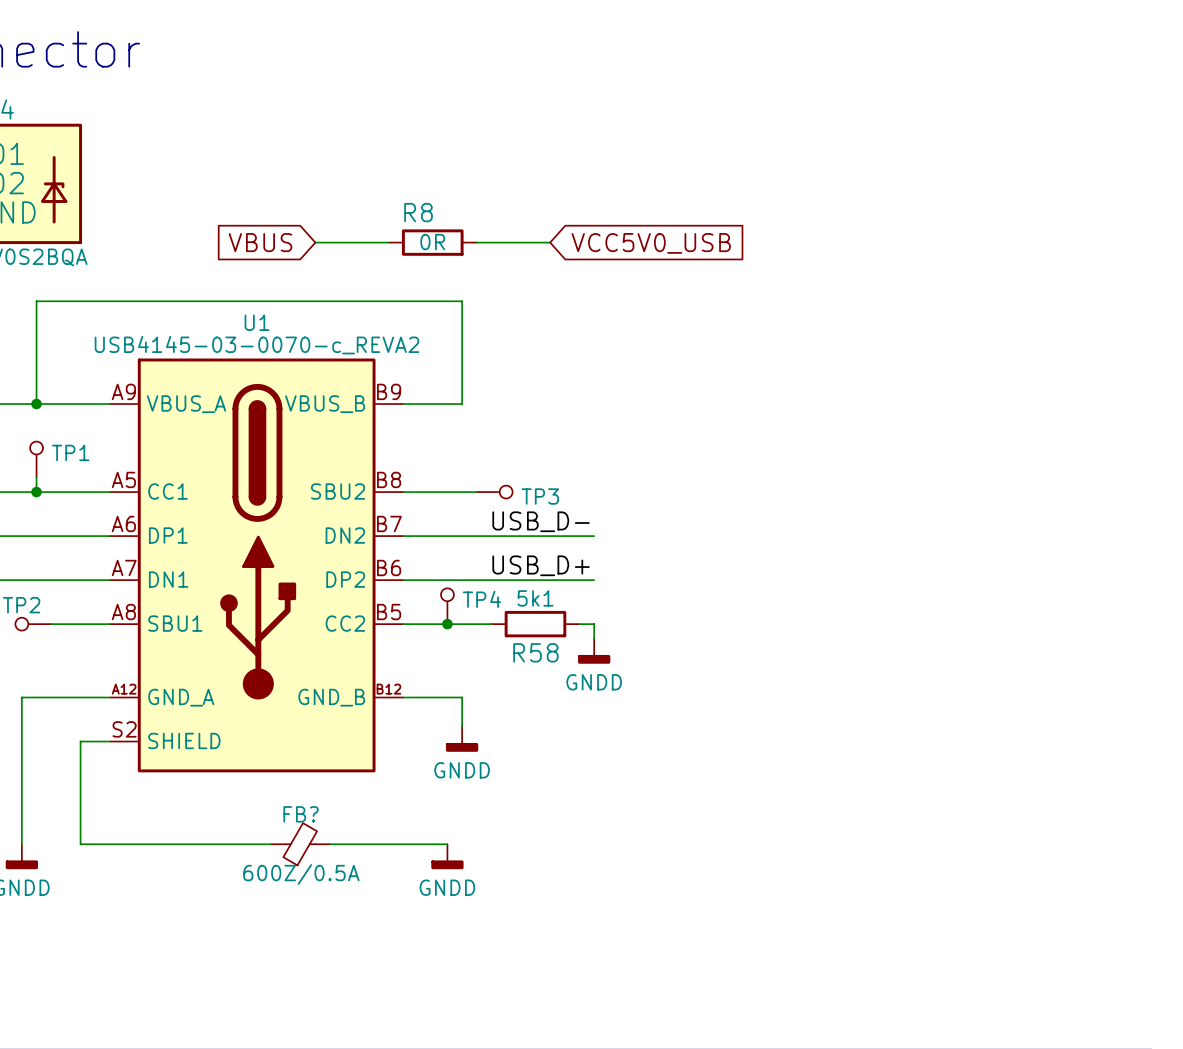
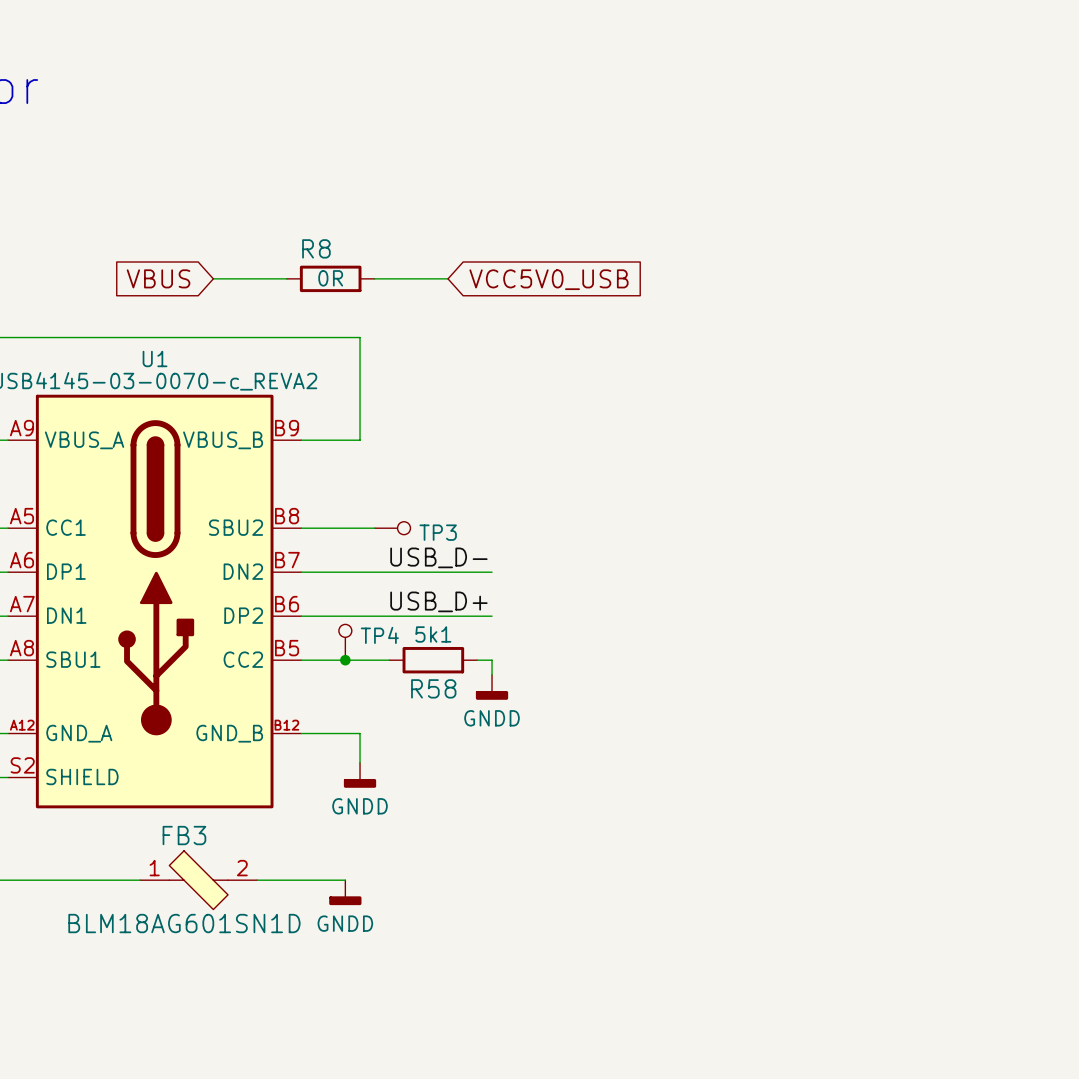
FB?: (300, 844) -> none
FB3: none -> BLM18AG601SN1D (198, 880)

